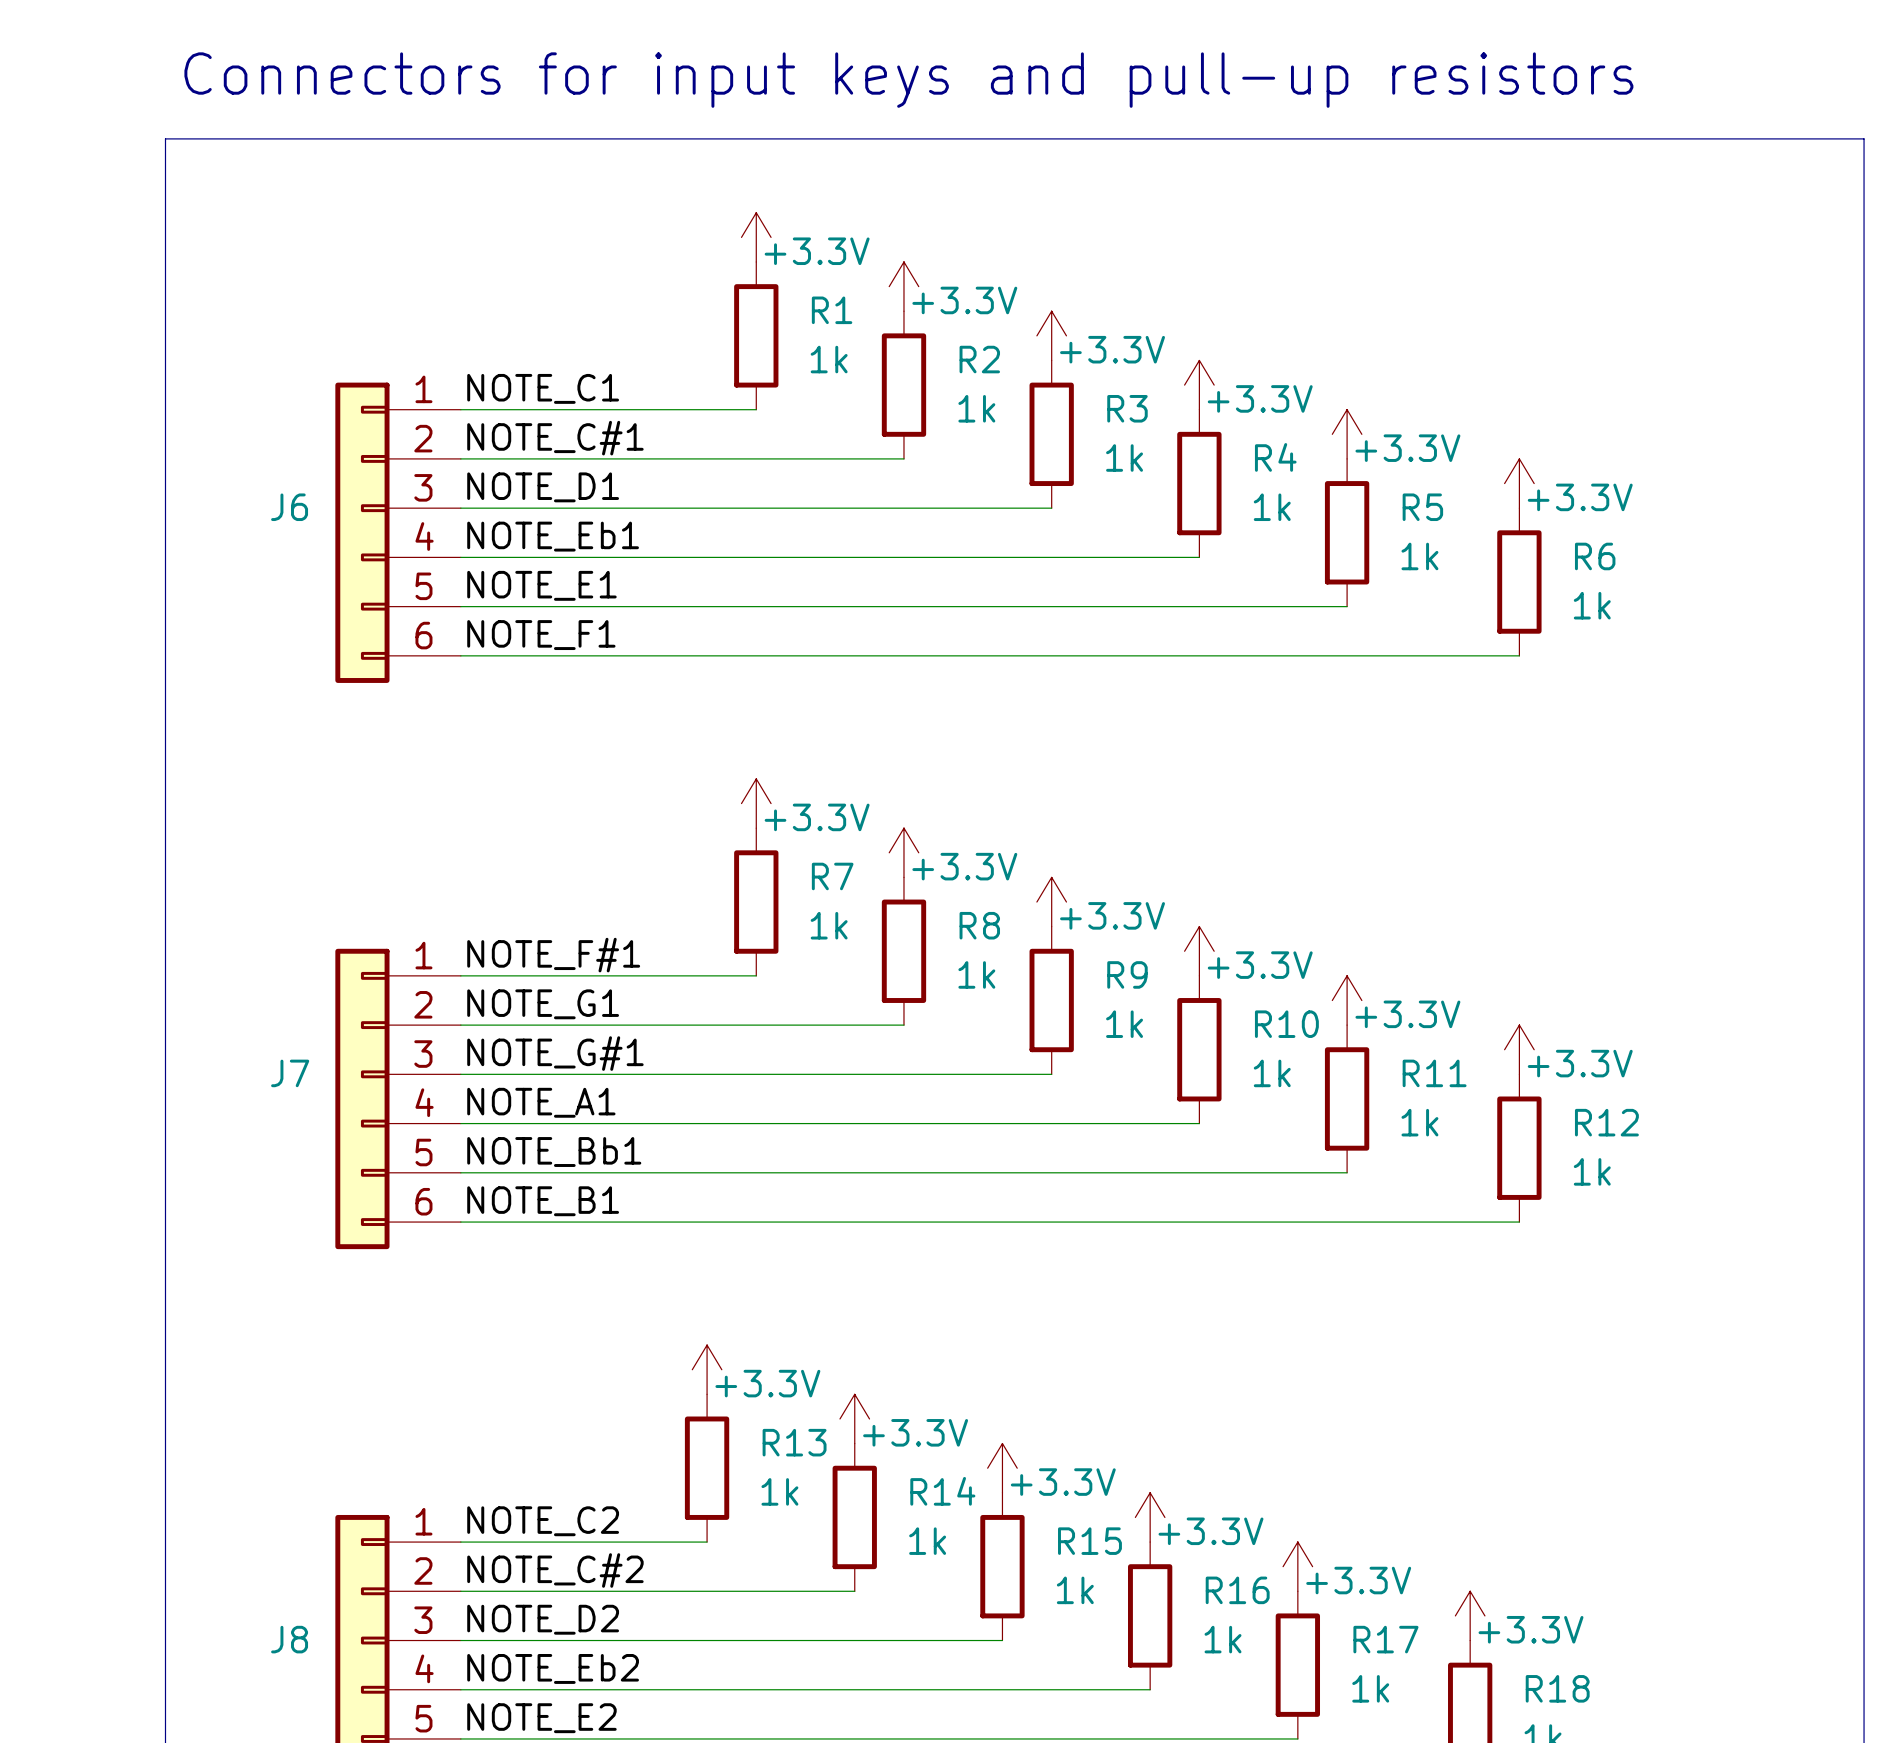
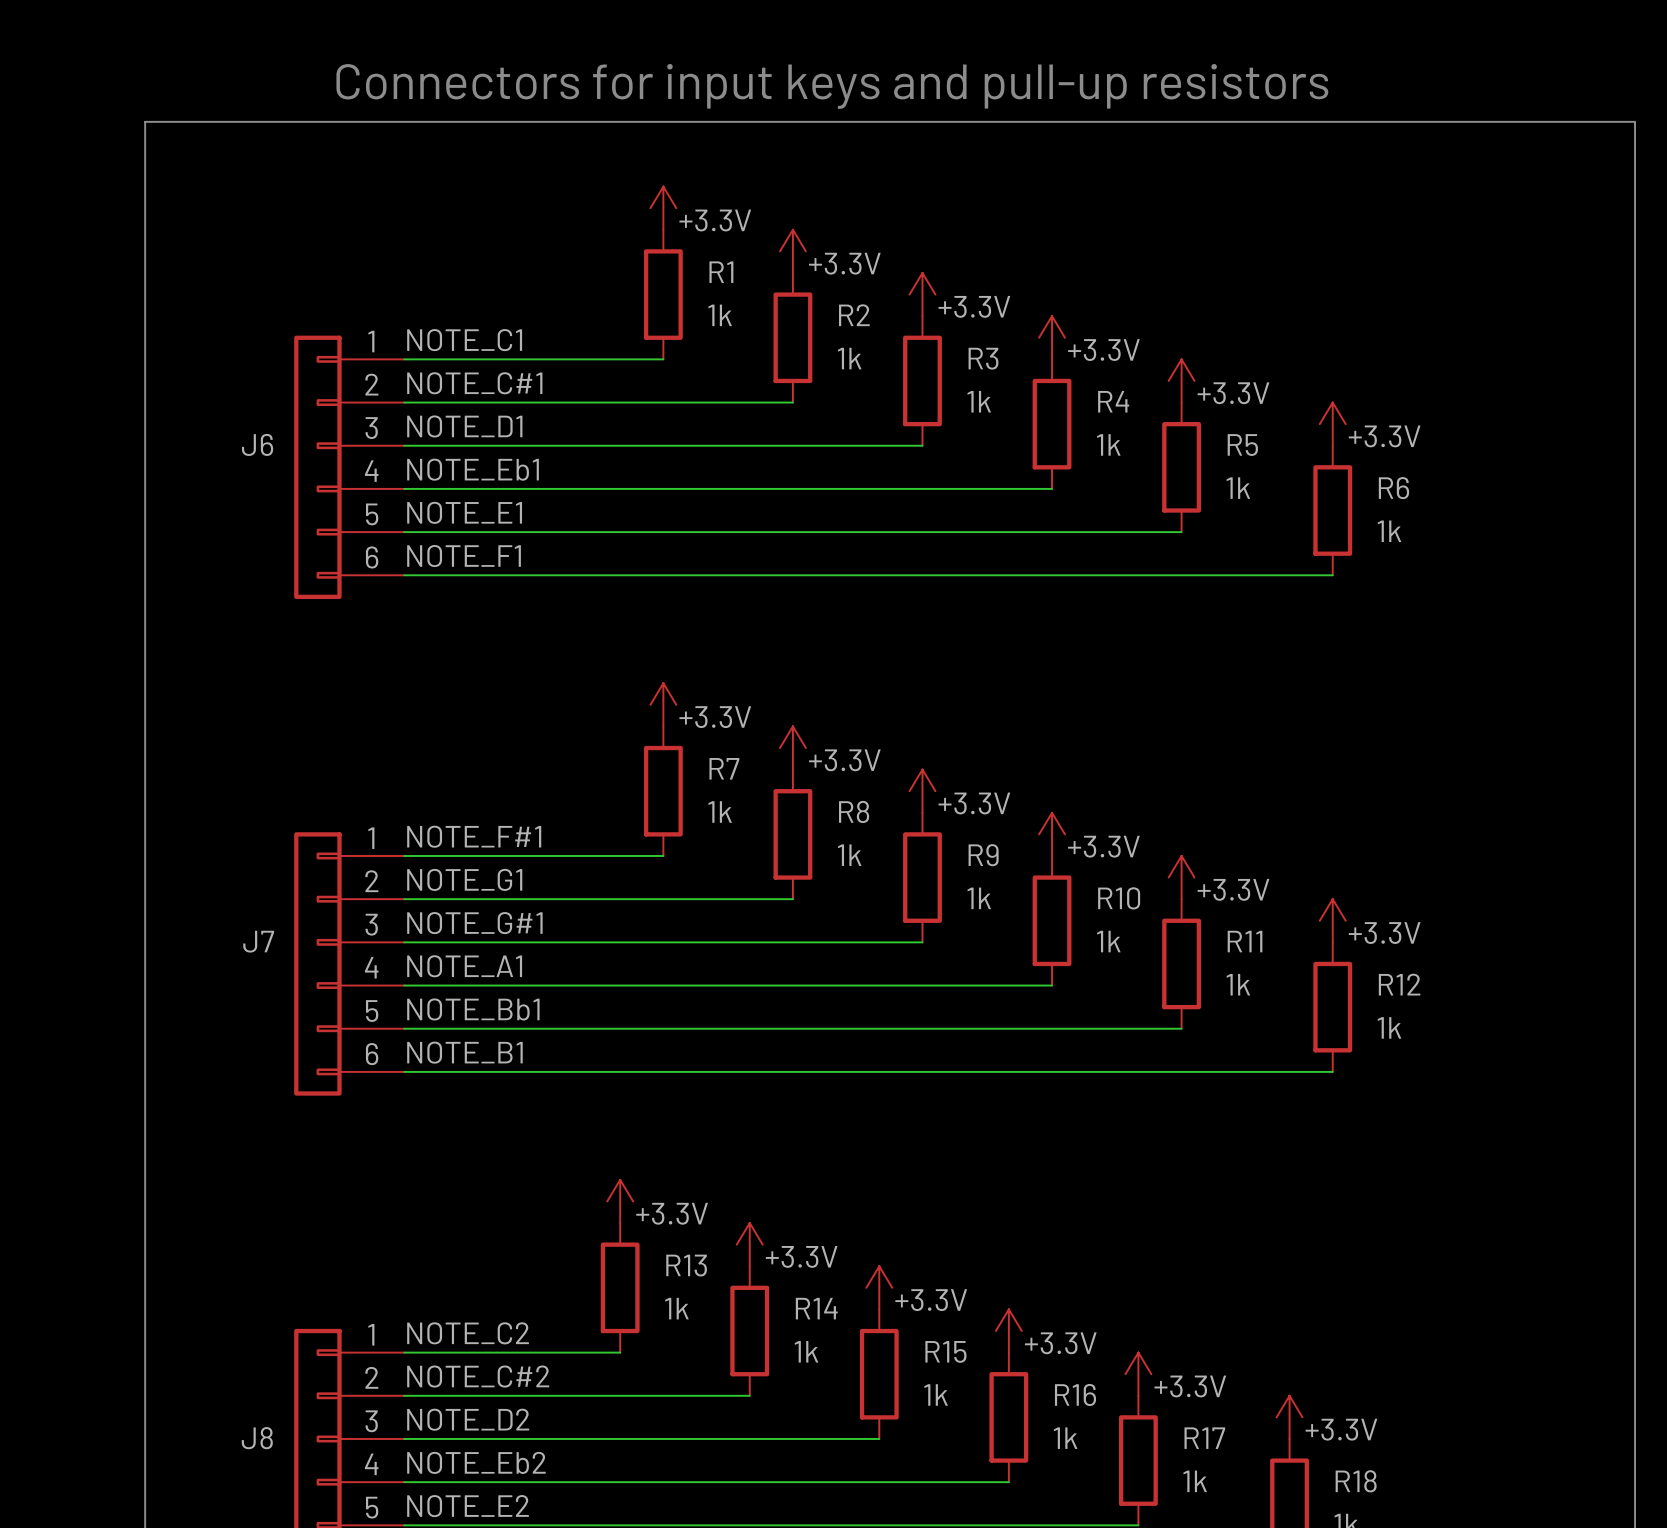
text position: Connectors for input keys and pull-up resistors (908, 80) -> Connectors for input keys and pull-up resistors (832, 86)

